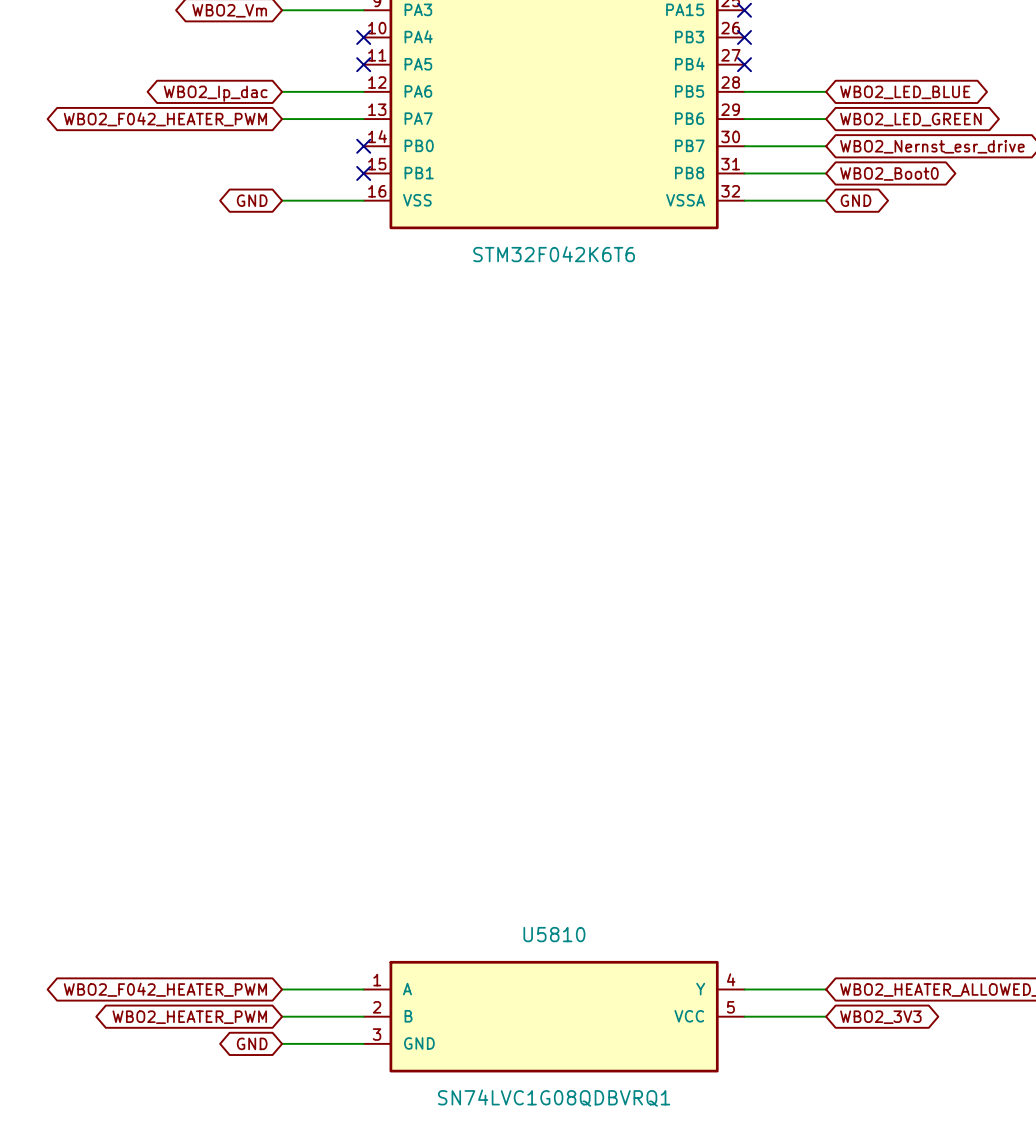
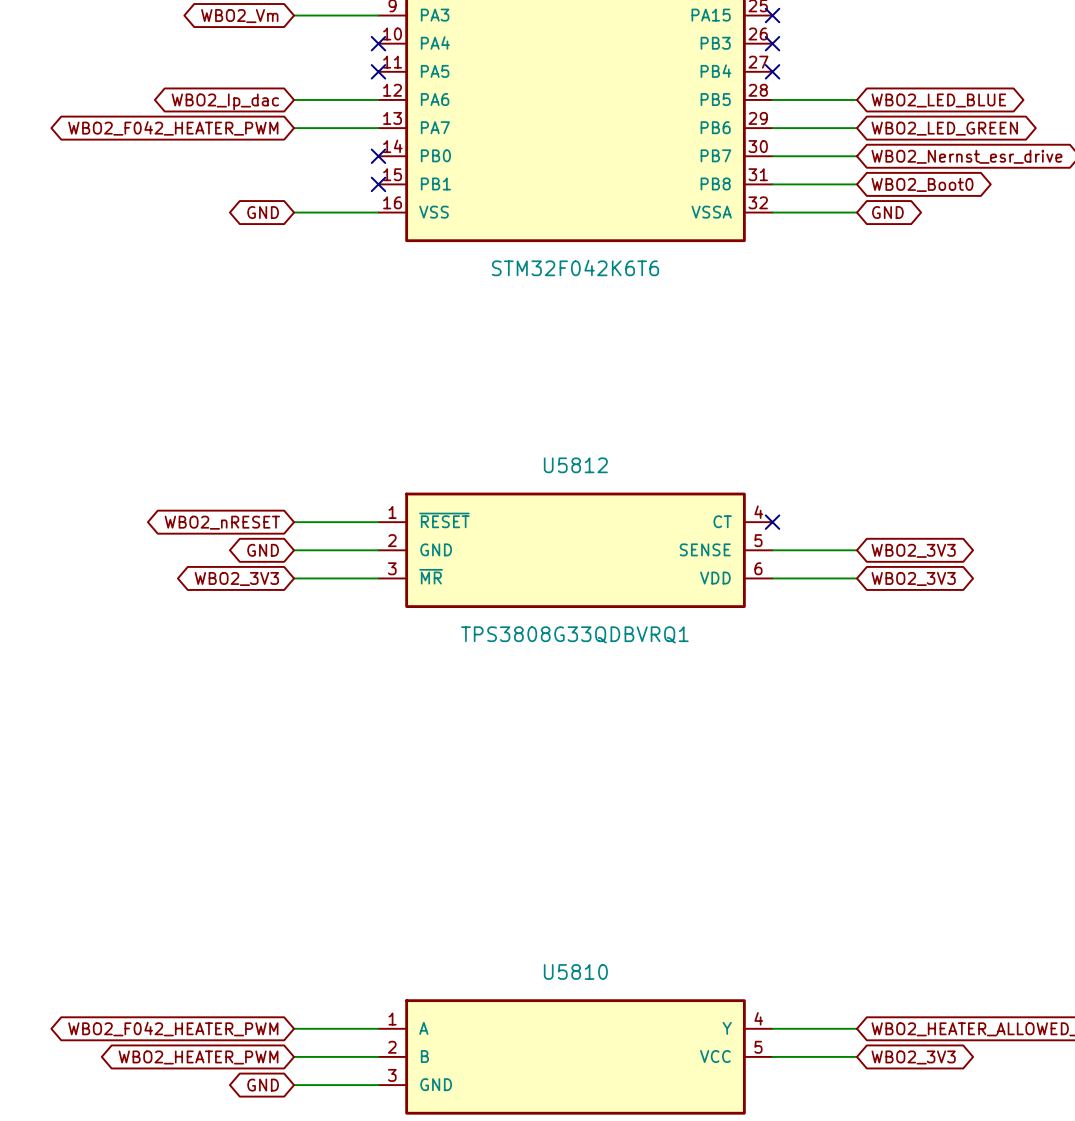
wire: none -> (294, 522) (378, 522)
no-connect mark: none -> (772, 522)
global label: none -> WBO2_nRESET (222, 522)
global label: none -> GND (263, 550)
wire: none -> (294, 550) (378, 550)
U5812: none -> TPS3808G33QDBVRQ1 (575, 550)
wire: none -> (772, 550) (856, 550)
global label: none -> WBO2_3V3 (913, 550)
global label: none -> WBO2_3V3 (236, 578)
wire: none -> (294, 578) (378, 578)
wire: none -> (772, 578) (856, 578)
global label: none -> WBO2_3V3 (913, 578)

